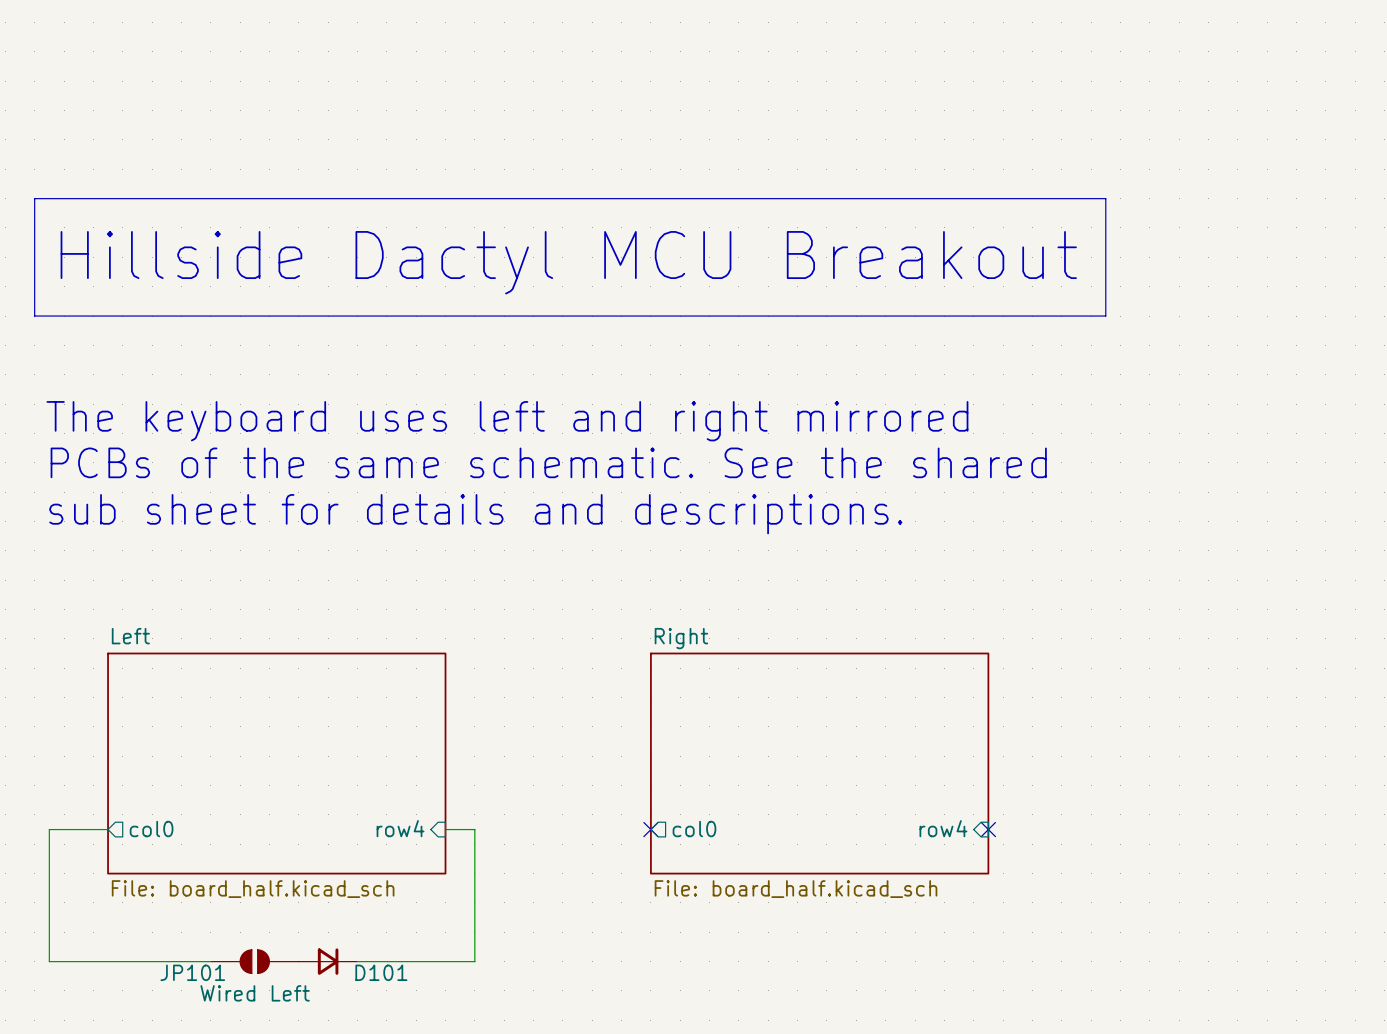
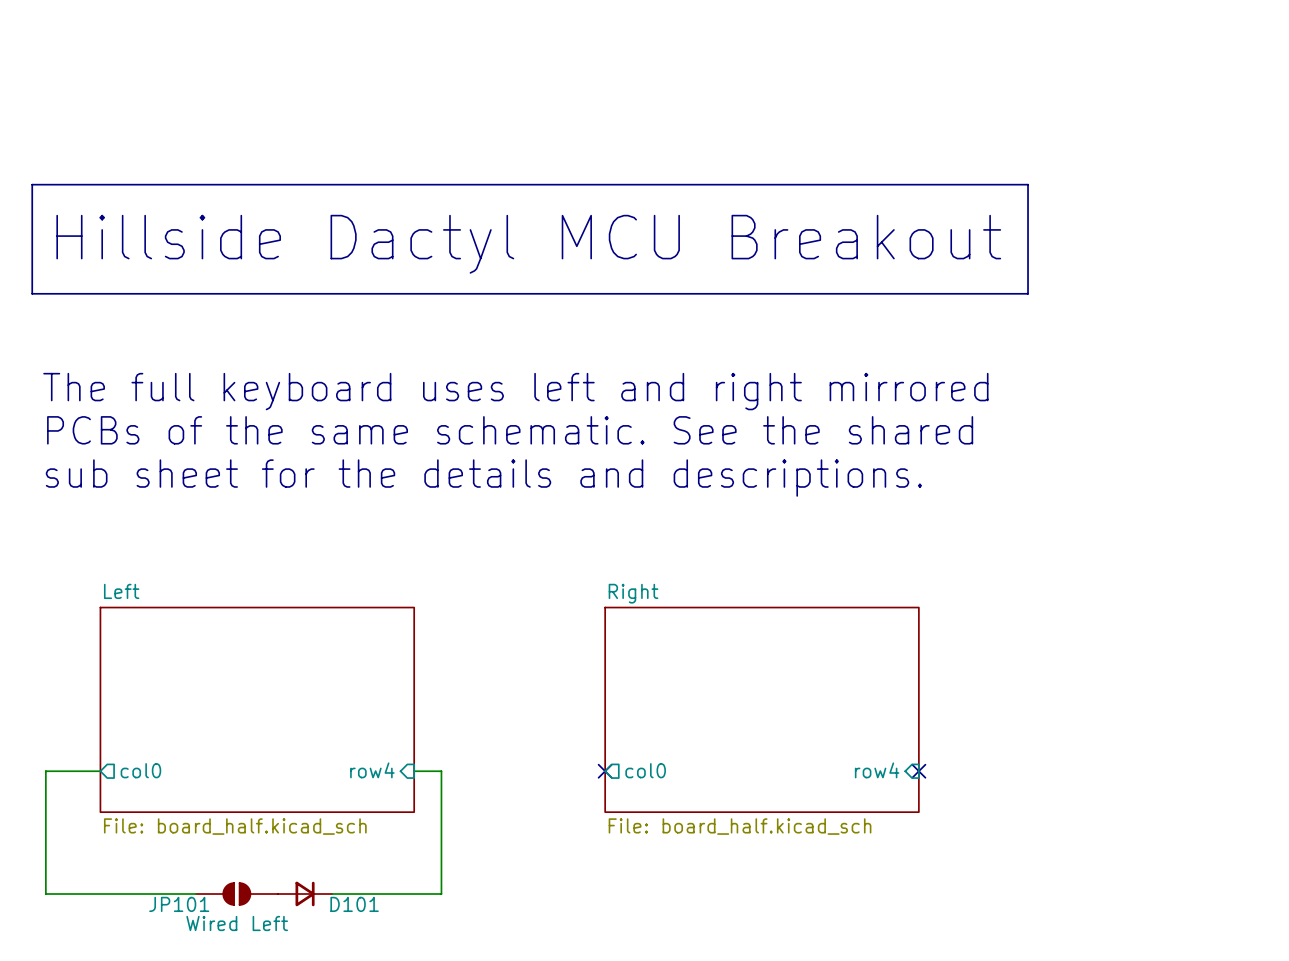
text: The keyboard uses left and right mirrored (507, 421) -> The full keyboard uses left and right mirrored (515, 391)
text: sub sheet for details and descriptions. (475, 514) -> sub sheet for the details and descriptions. (483, 478)

